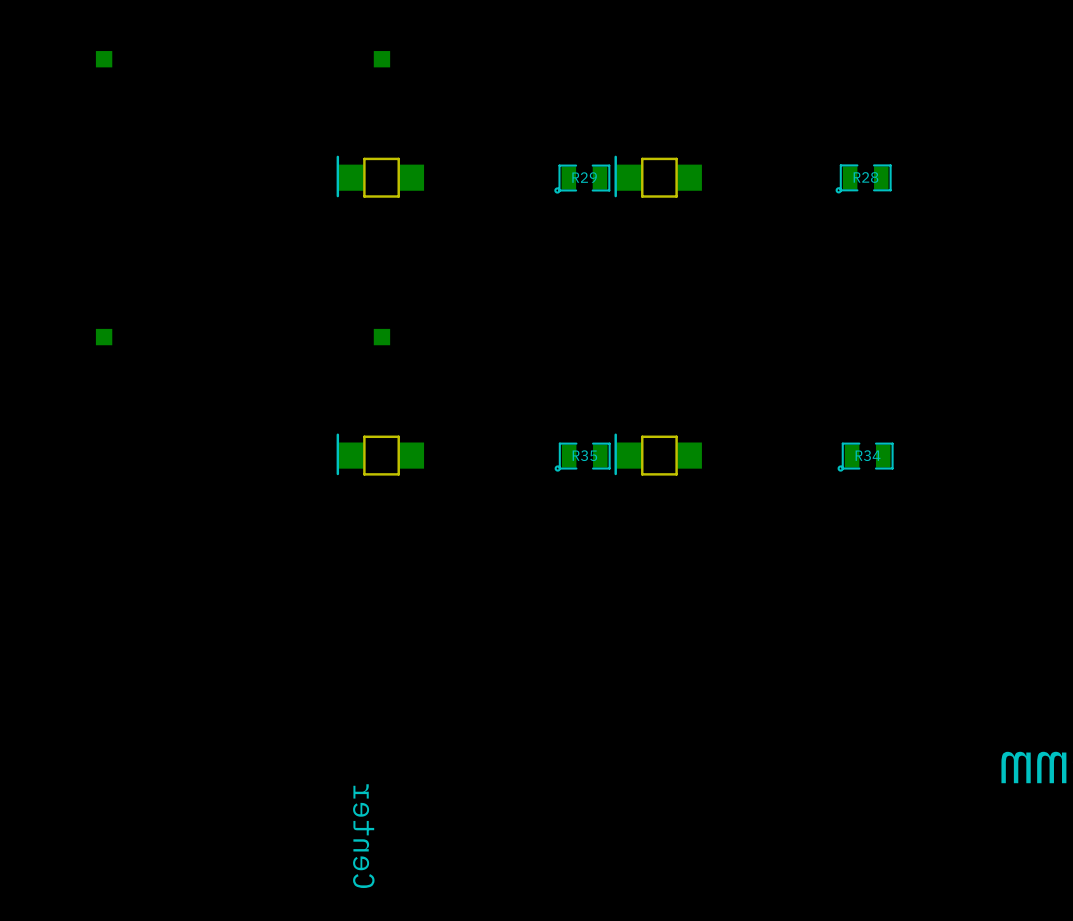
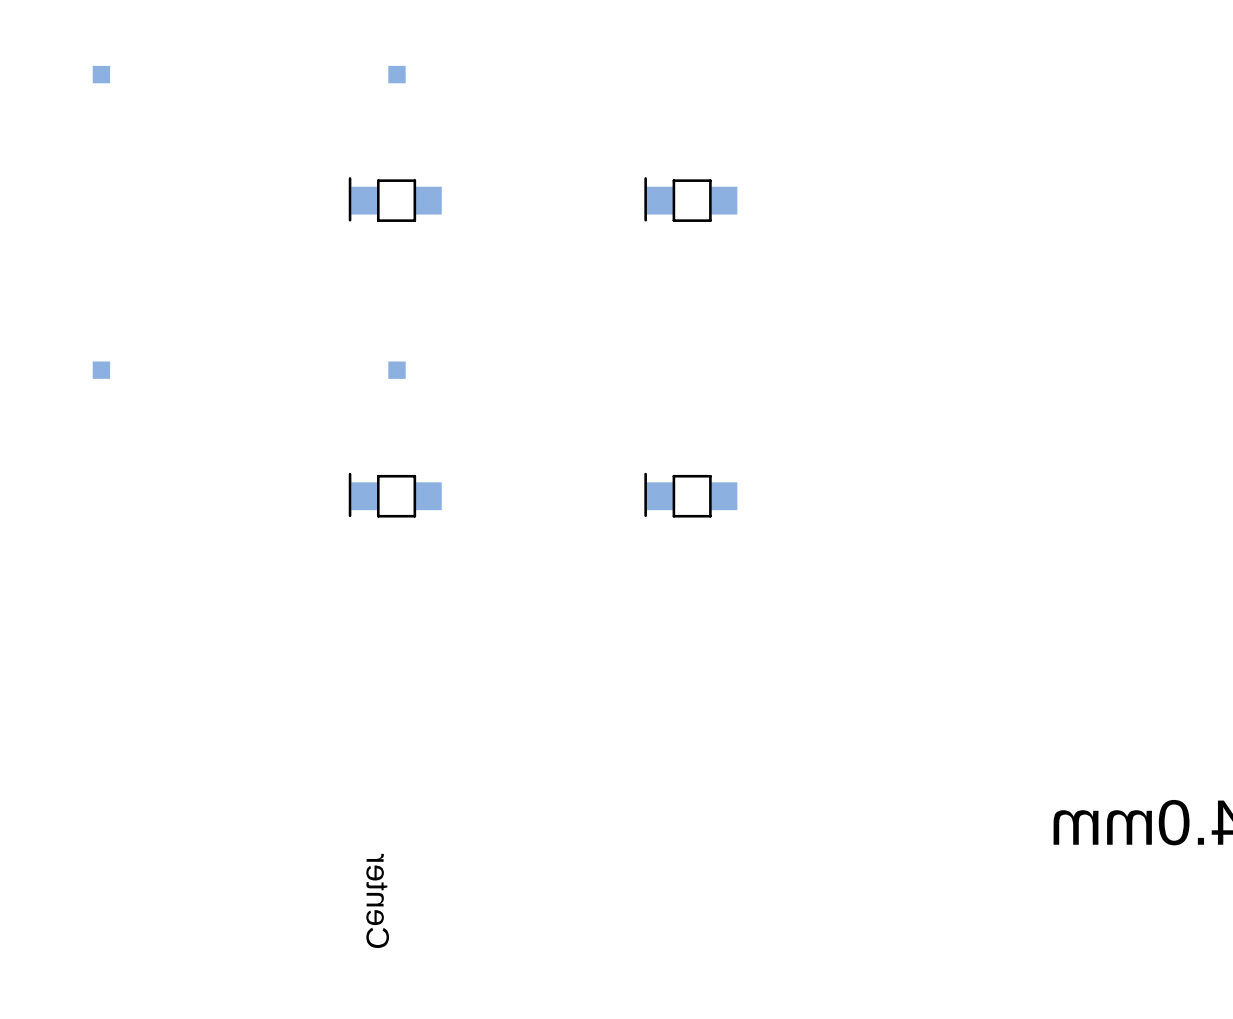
R28: (863, 178) -> none
R29: (582, 179) -> none
R35: (582, 457) -> none
R34: (865, 457) -> none

